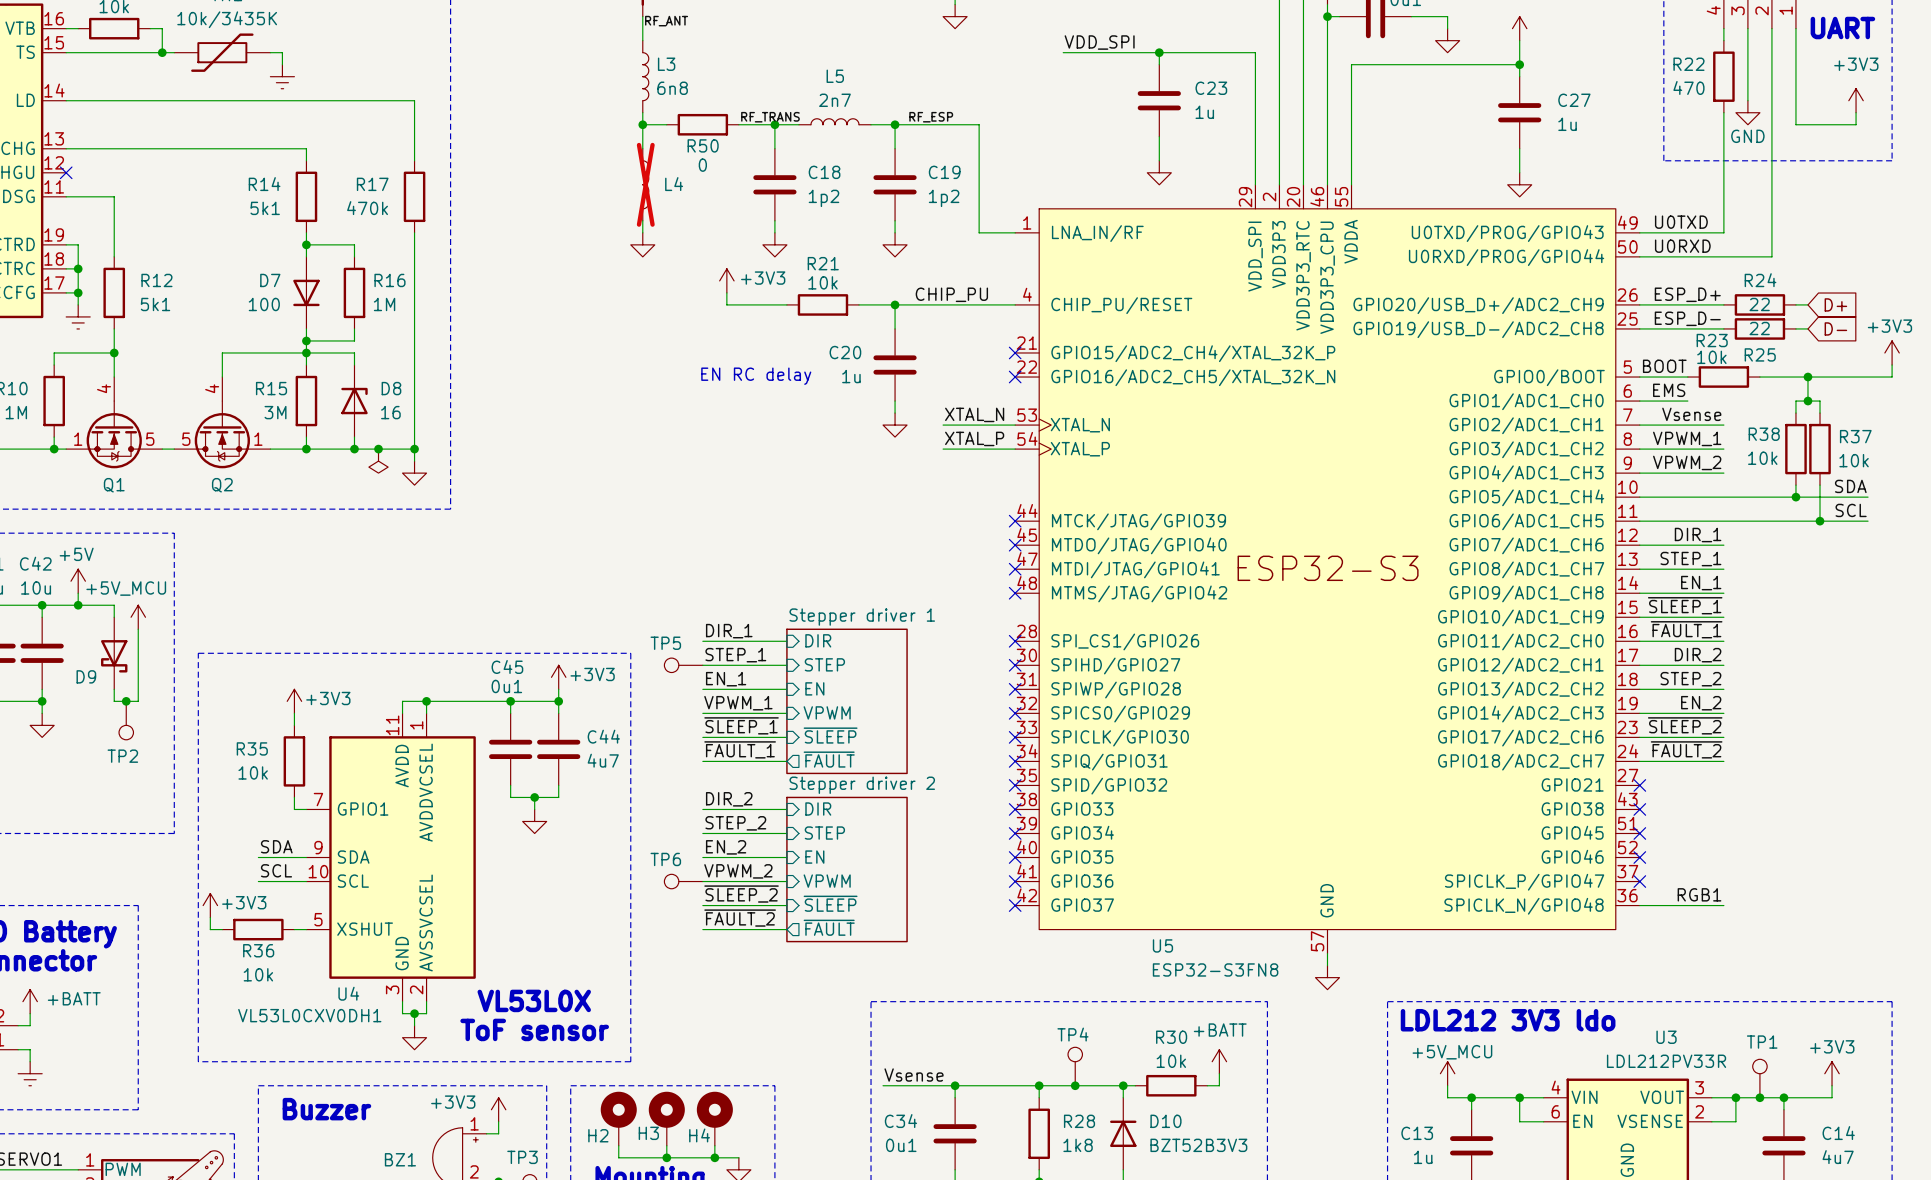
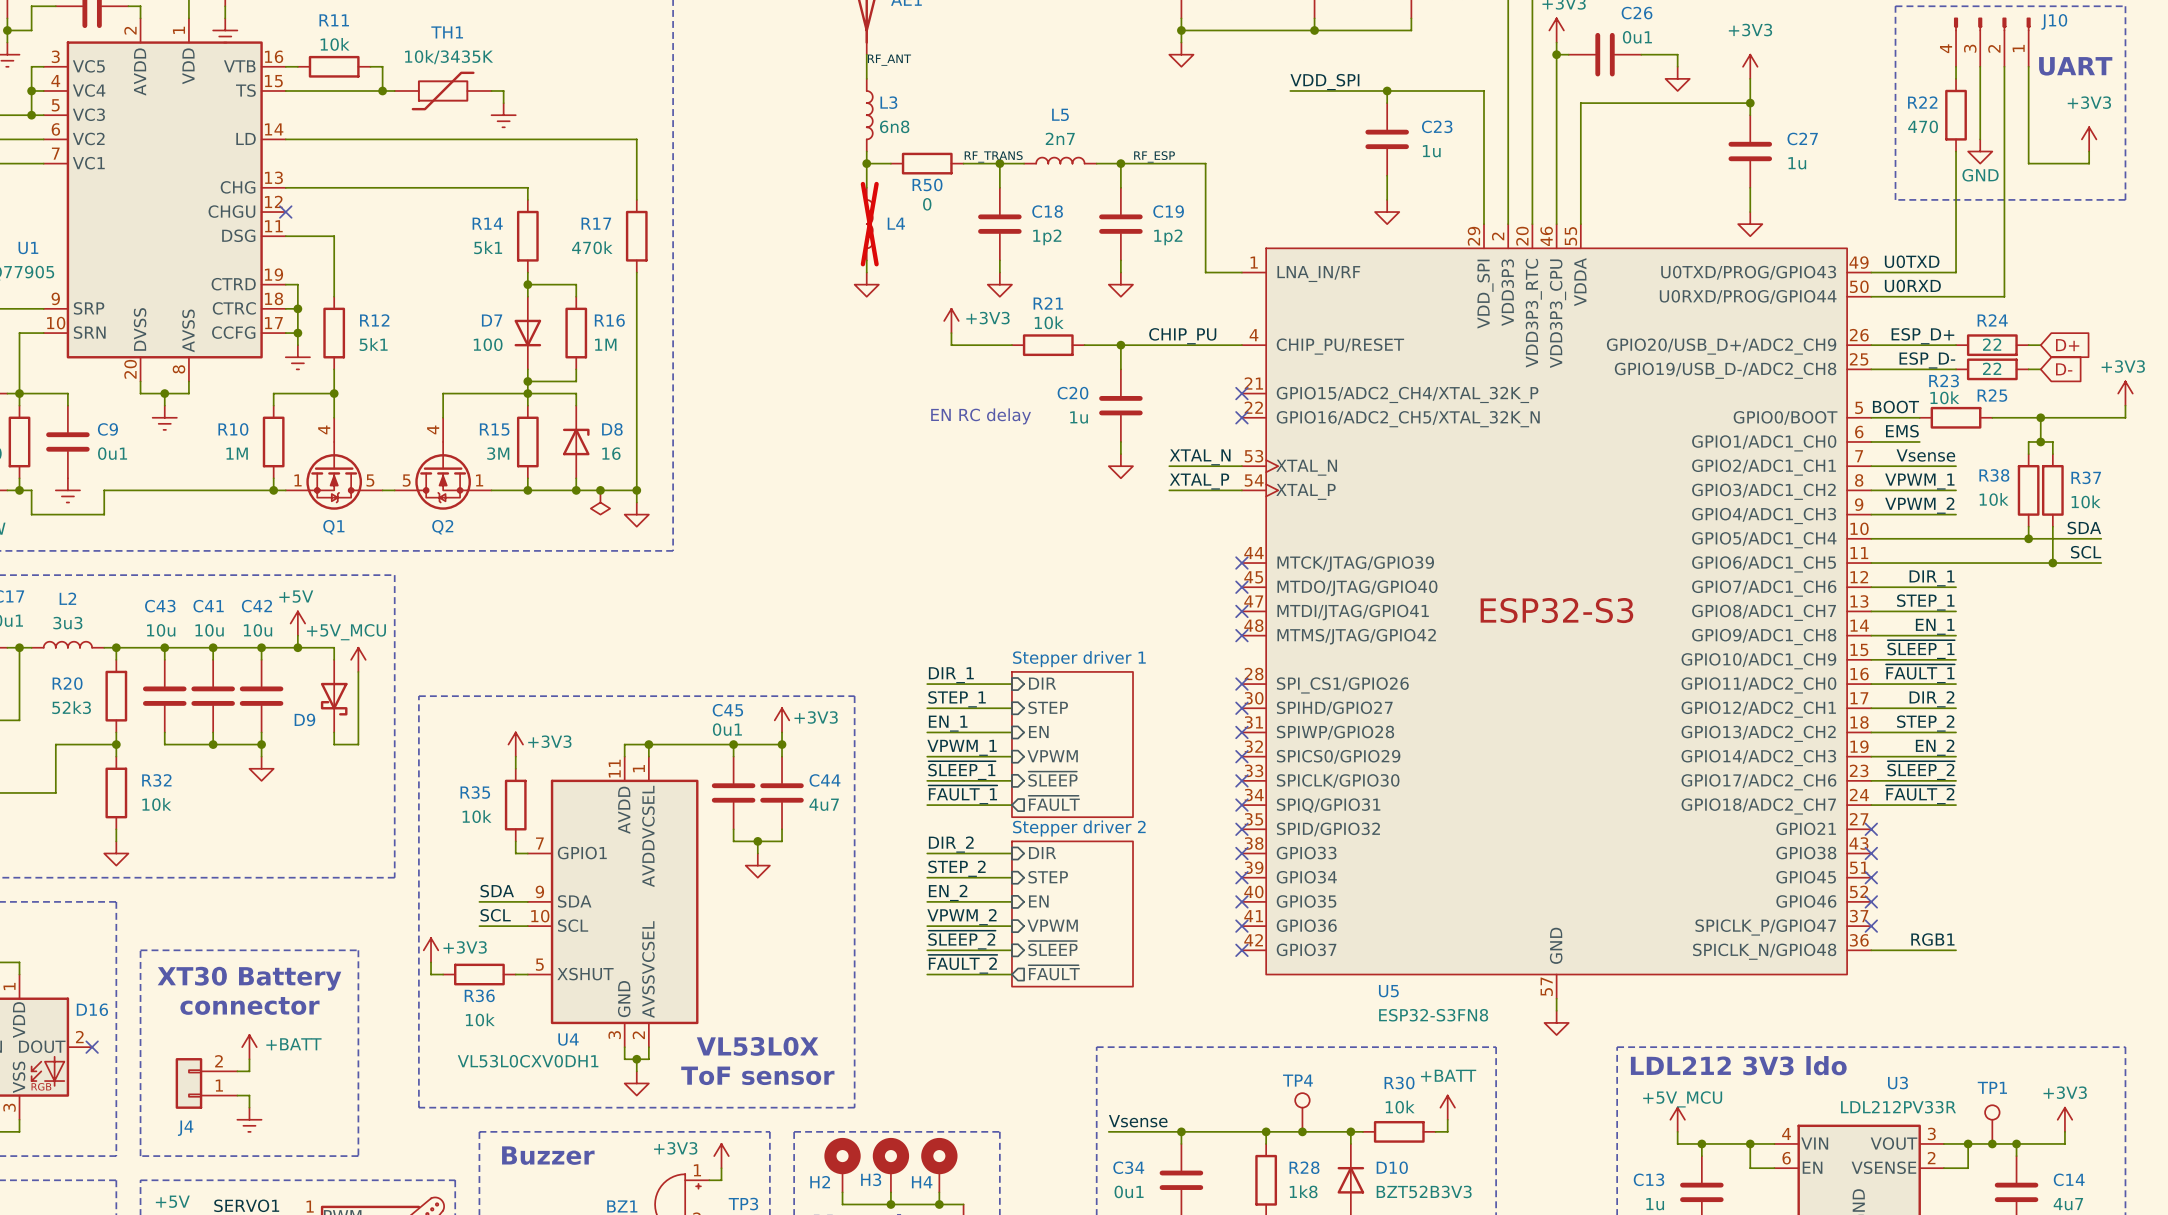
TP5: (683, 665) -> none
junction: (126, 701) -> none
TP2: (126, 720) -> none
TP6: (683, 881) -> none

